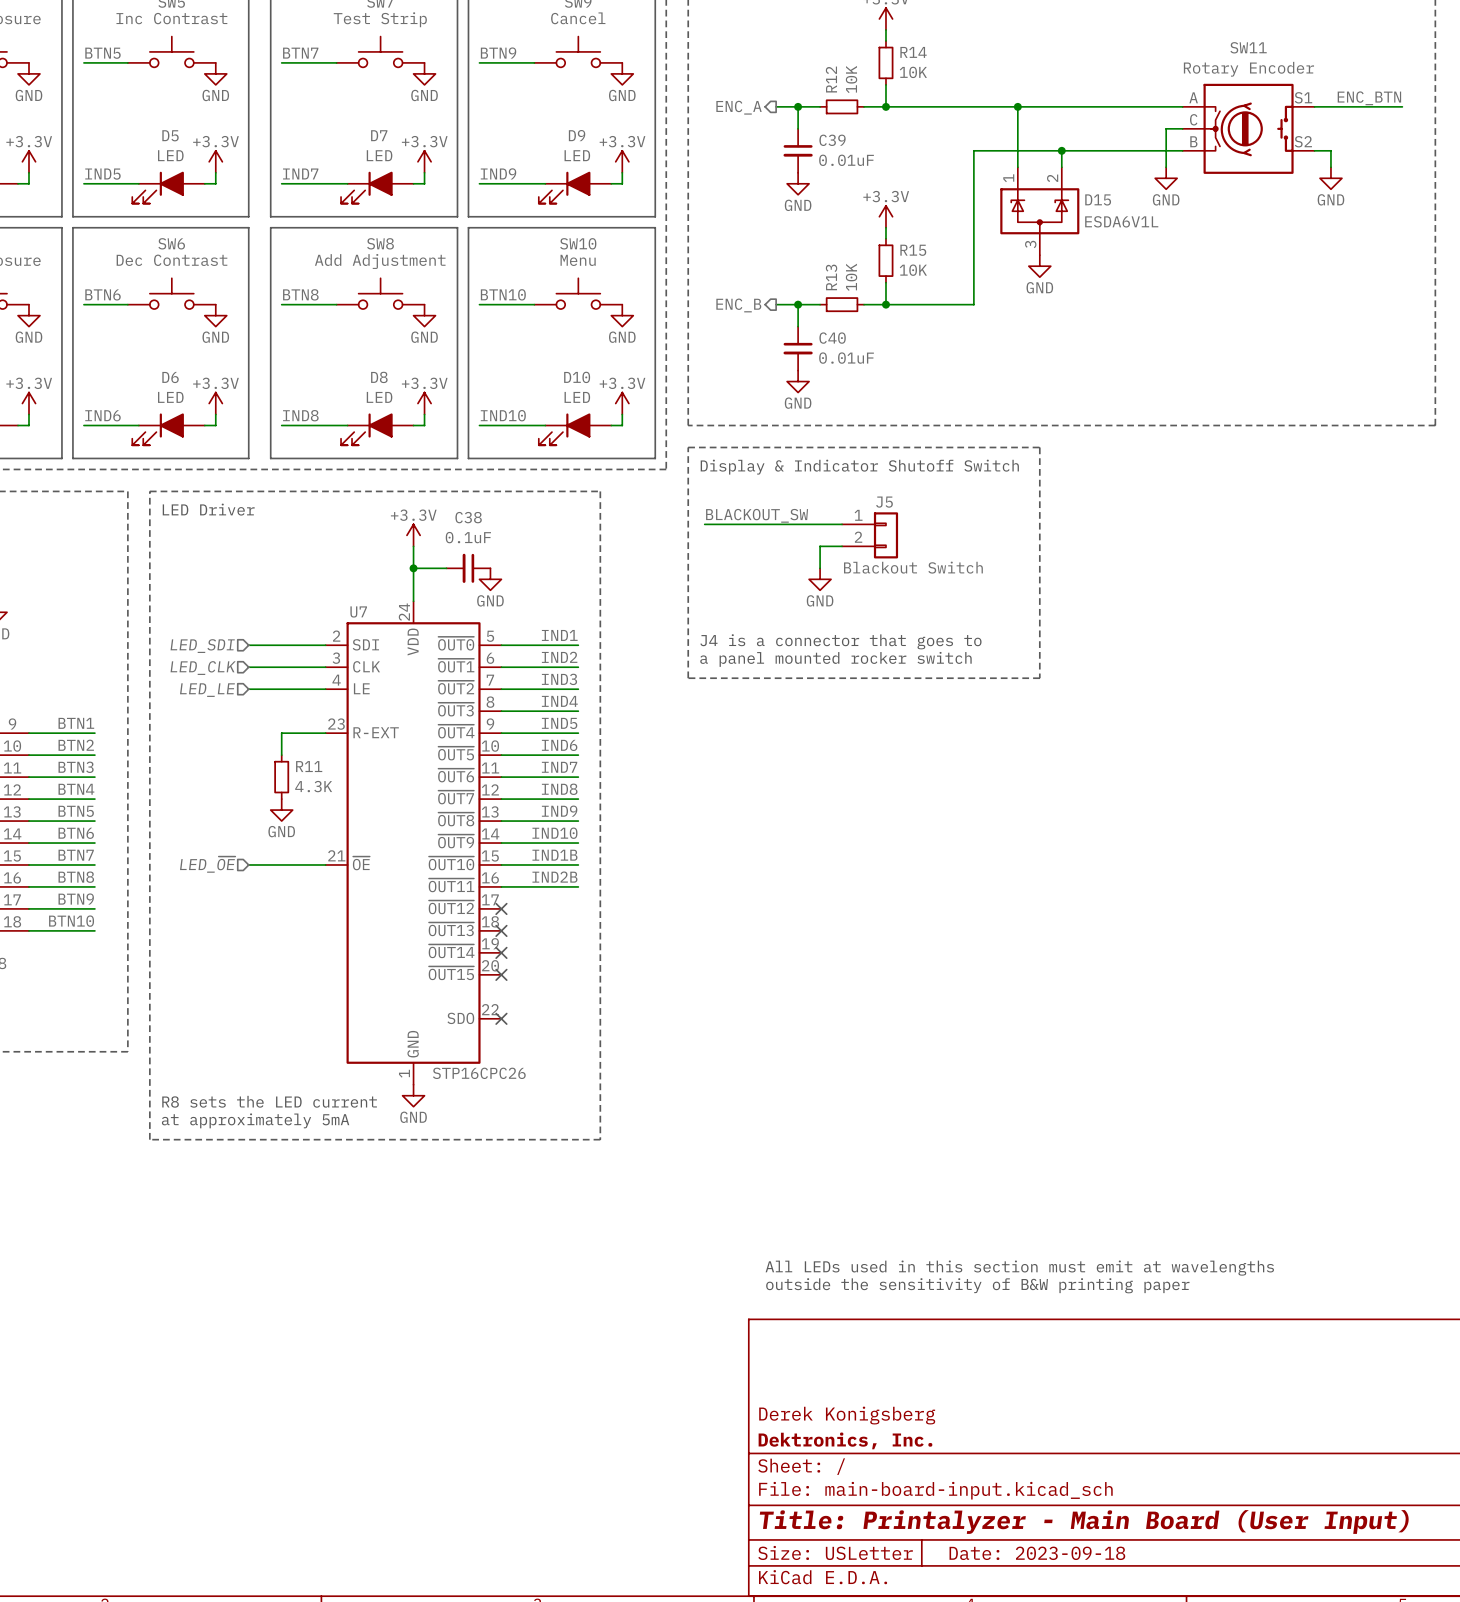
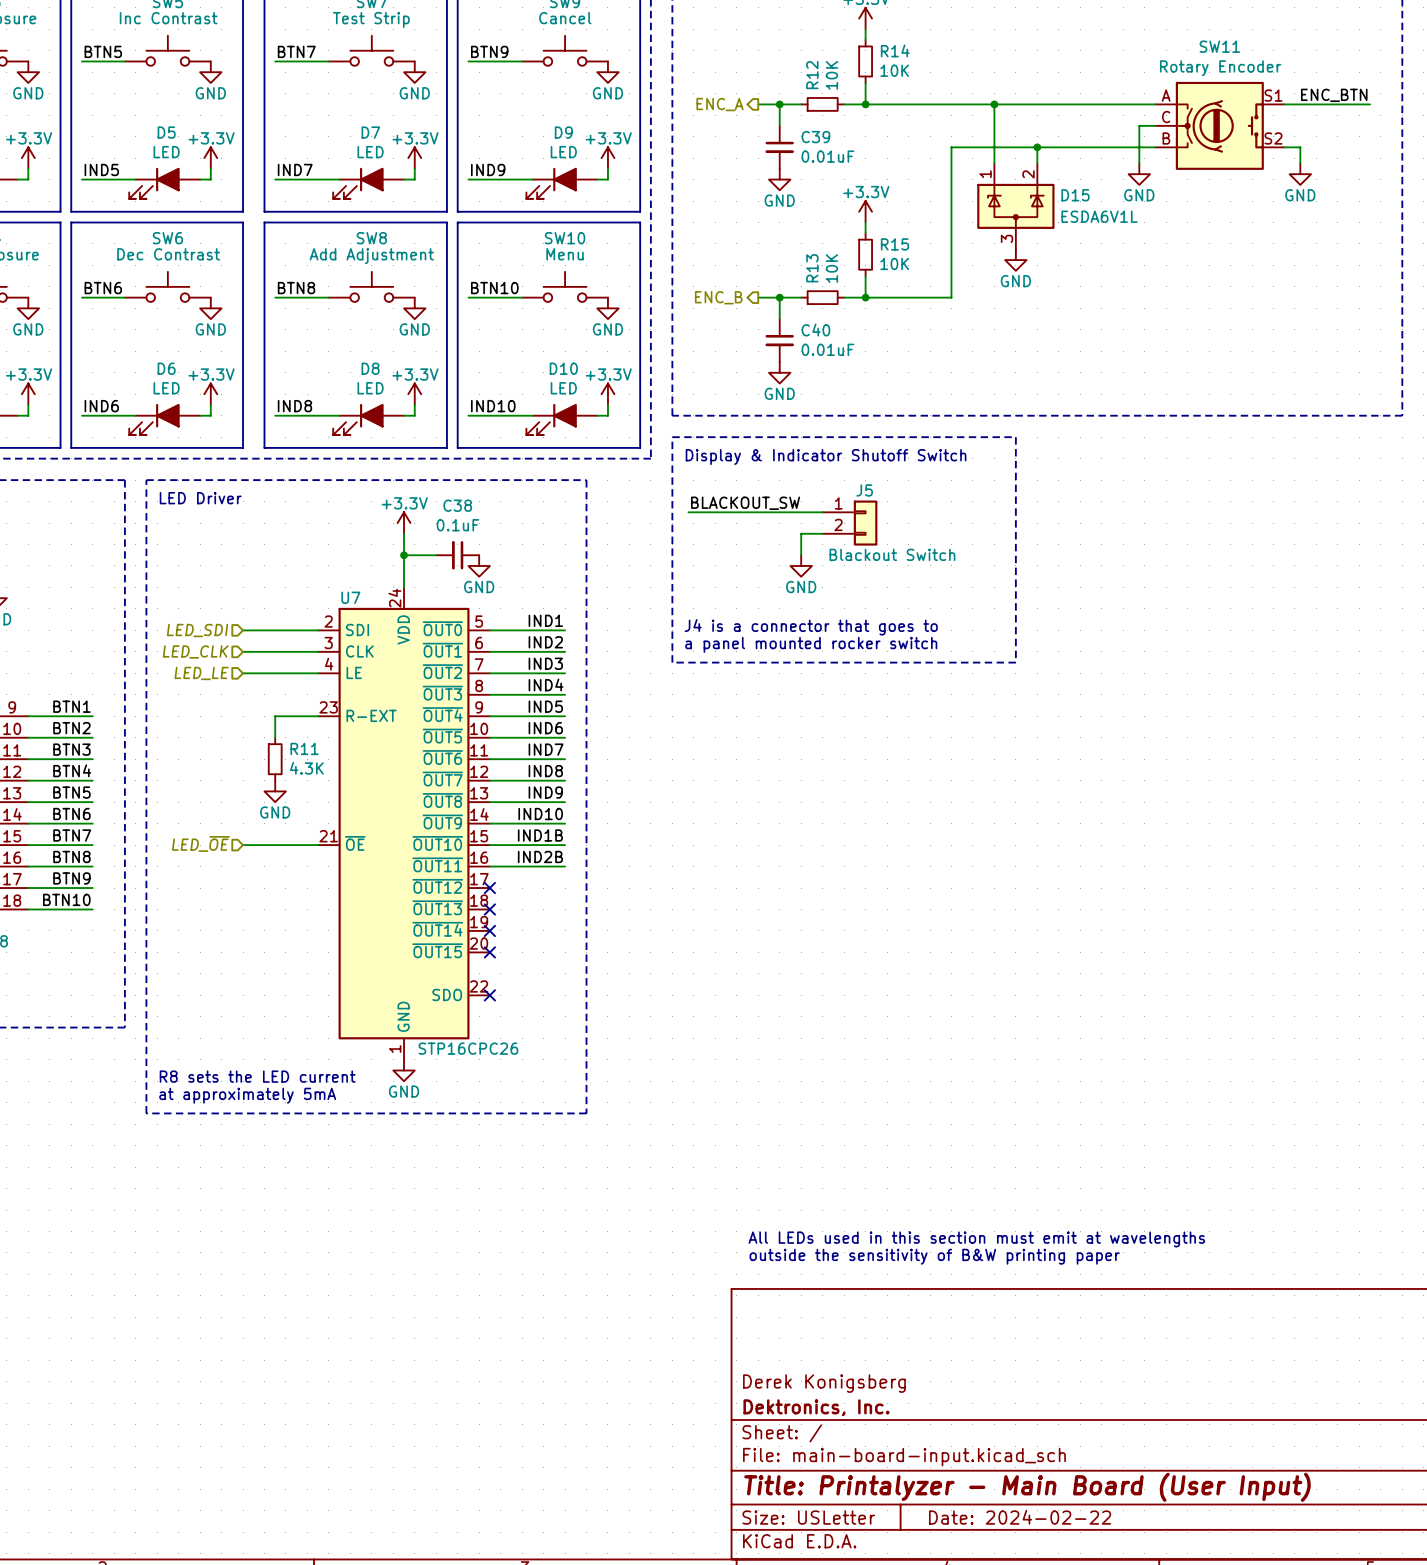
title block: Date: 2023-09-18 (1037, 1553) -> Date: 2024-02-22 (1020, 1517)

